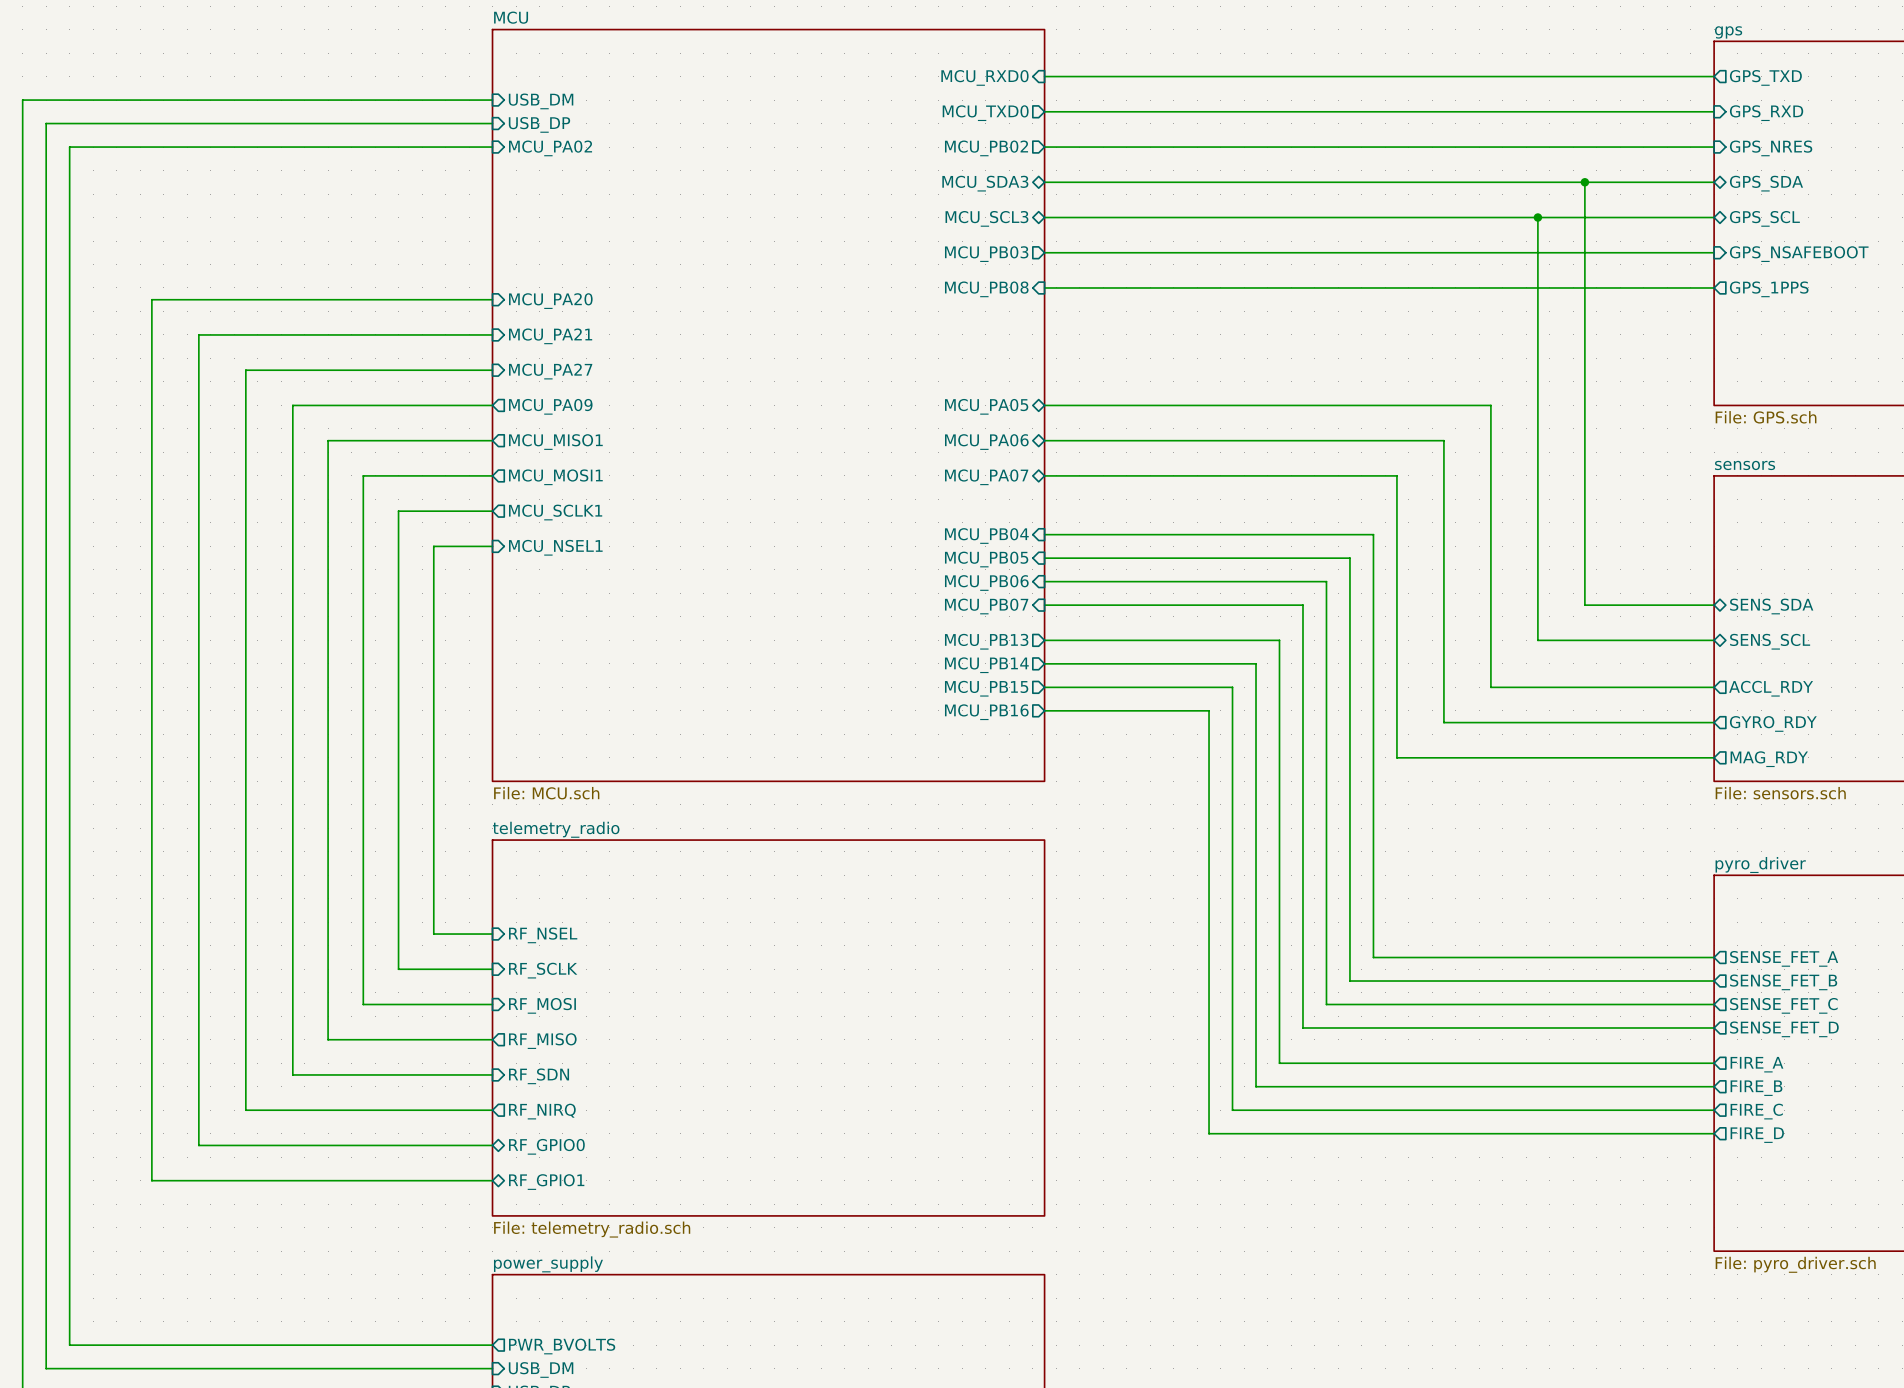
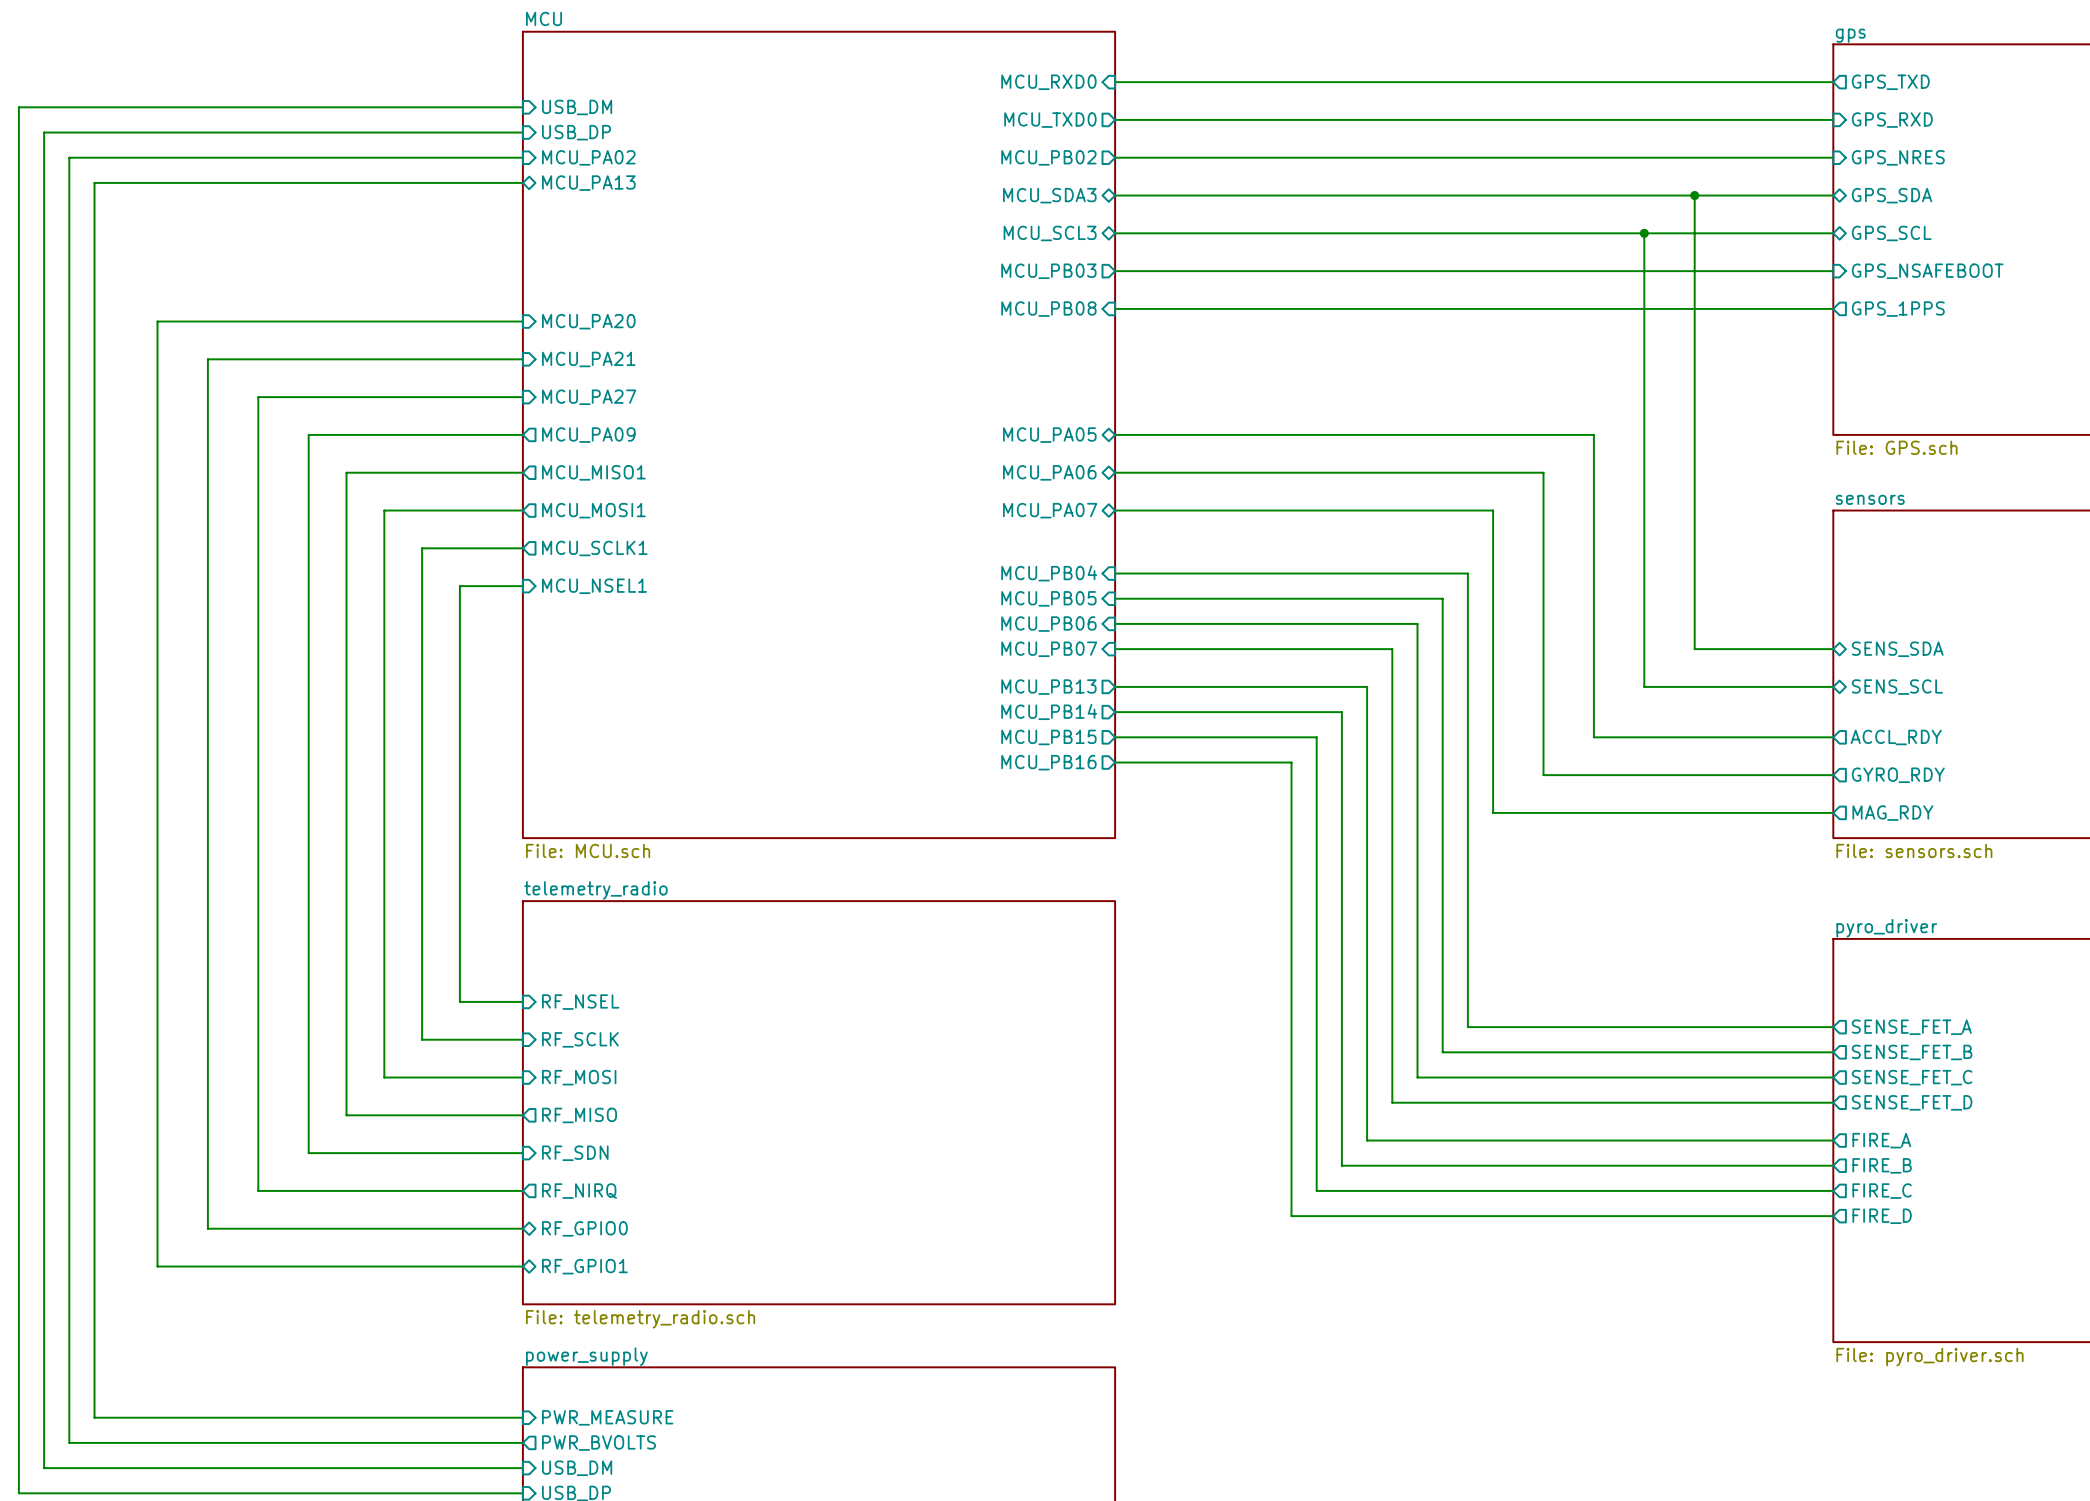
wire: none -> (522, 182) (94, 182) (94, 1417) (522, 1417)
sheet pin: none -> MCU_PA13 (588, 183)
sheet pin: none -> PWR_MEASURE (607, 1417)

